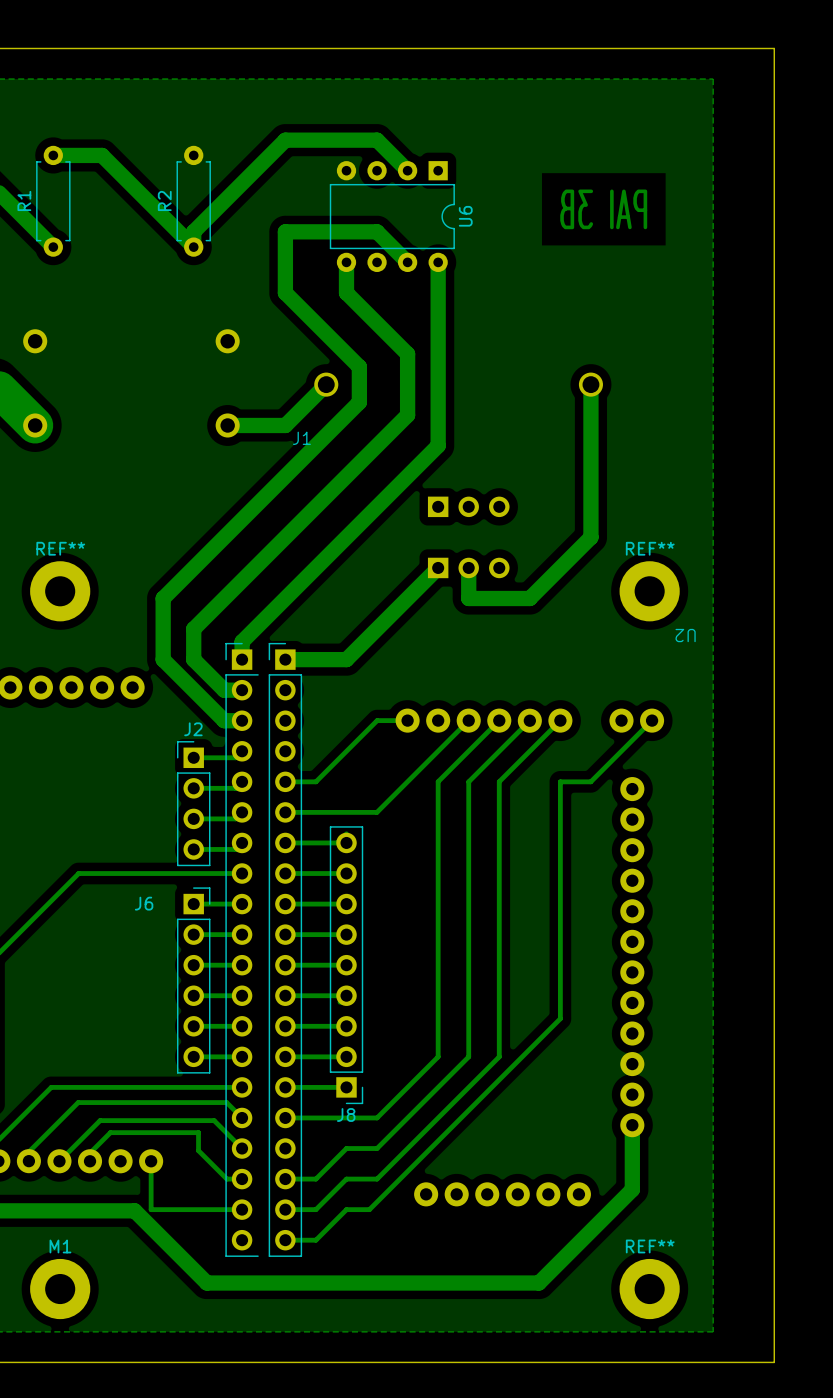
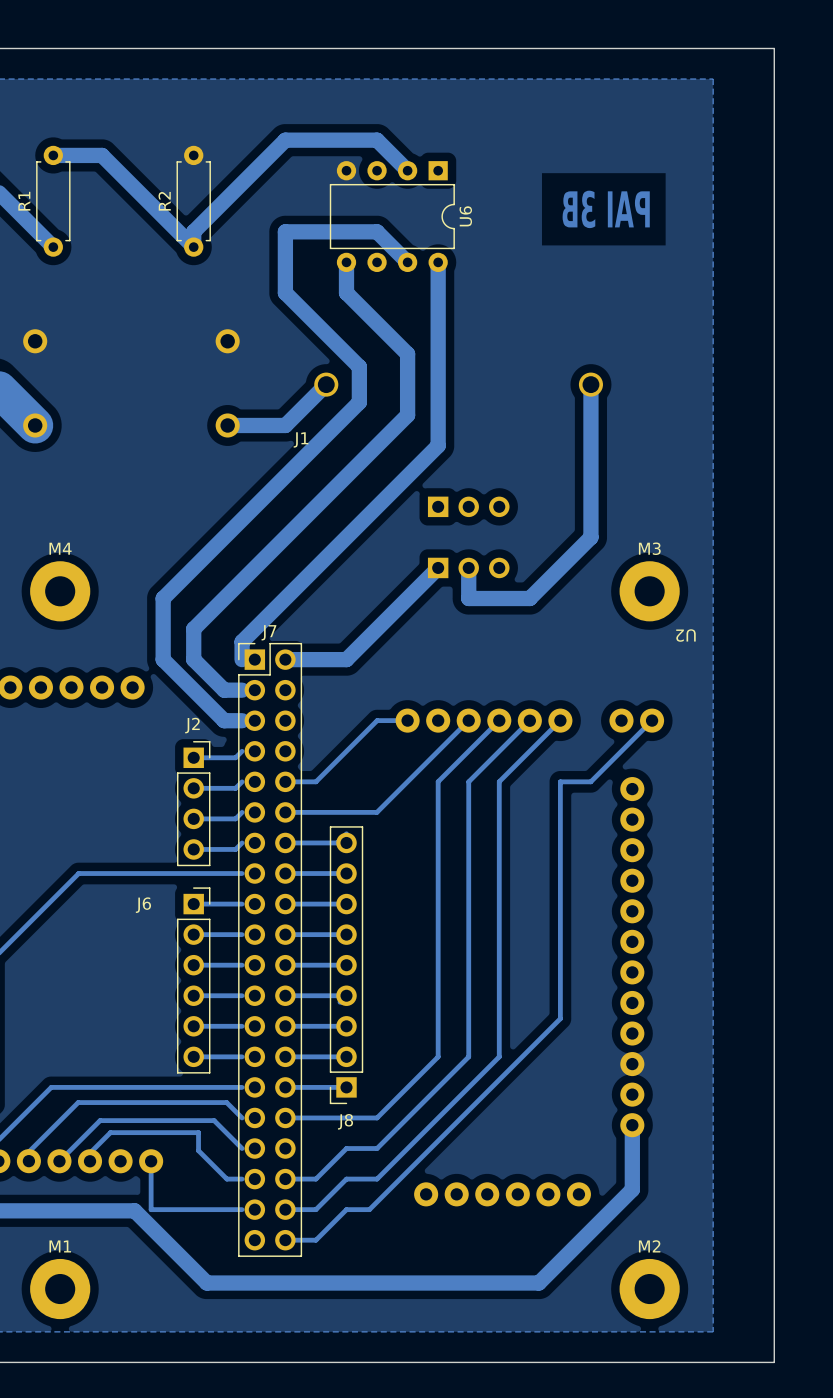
REF** name: REF** (60, 548) -> M4 (60, 548)
REF** name: REF** (650, 548) -> M3 (649, 548)
J2 footprint: [176, 741, 211, 867] -> [176, 741, 211, 867]
J8 footprint: [329, 826, 364, 1105] -> [329, 826, 364, 1105]
part: (263, 949) -> none
J7: none -> (270, 949)
REF** name: REF** (650, 1246) -> M2 (649, 1246)

